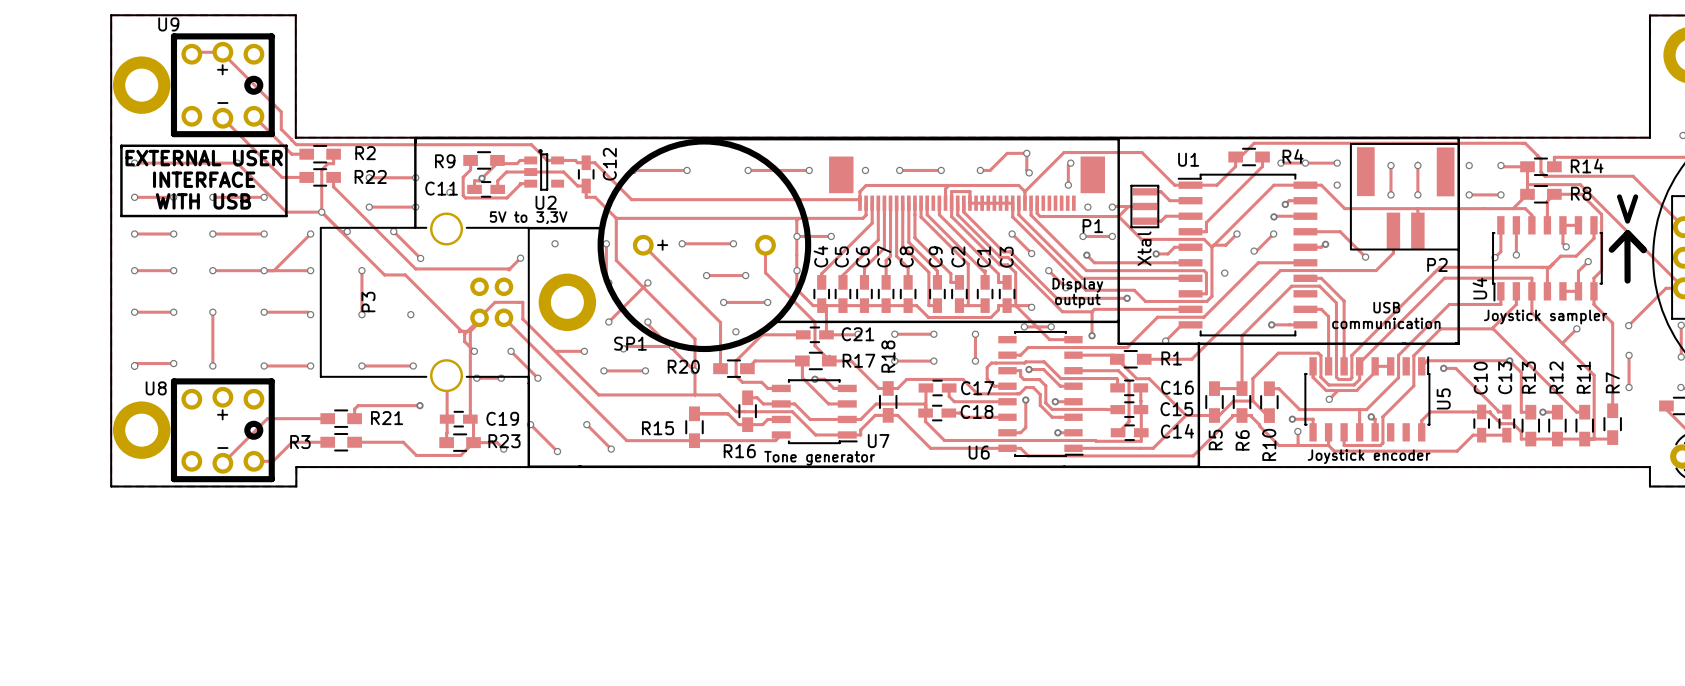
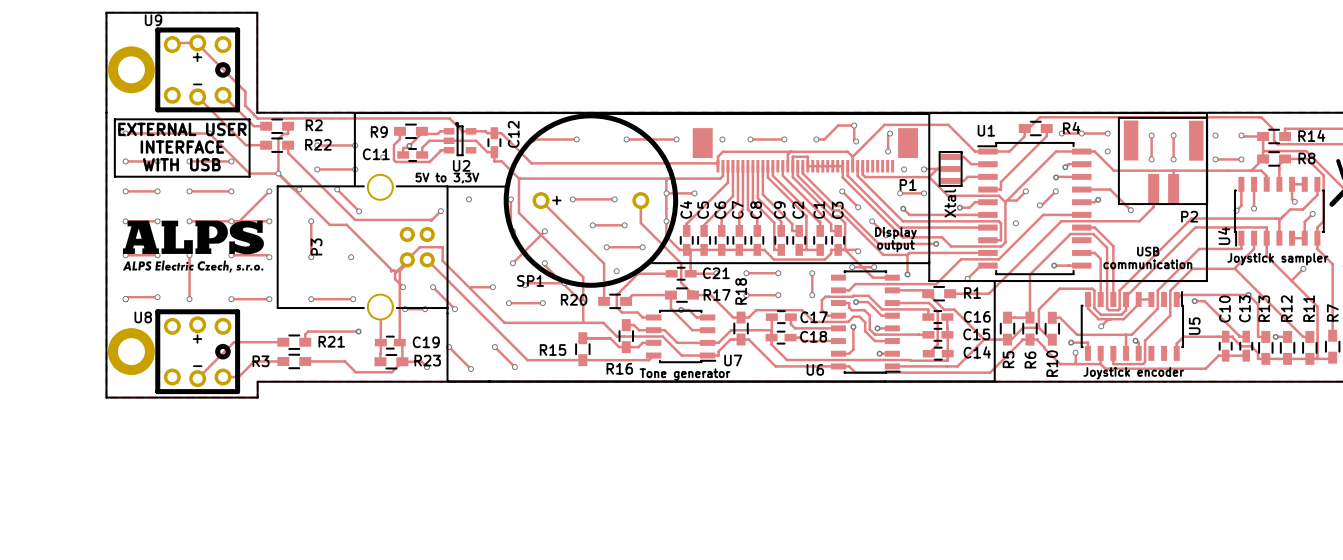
drawing: none -> [122, 220, 264, 273]
part: (567, 302) -> none

